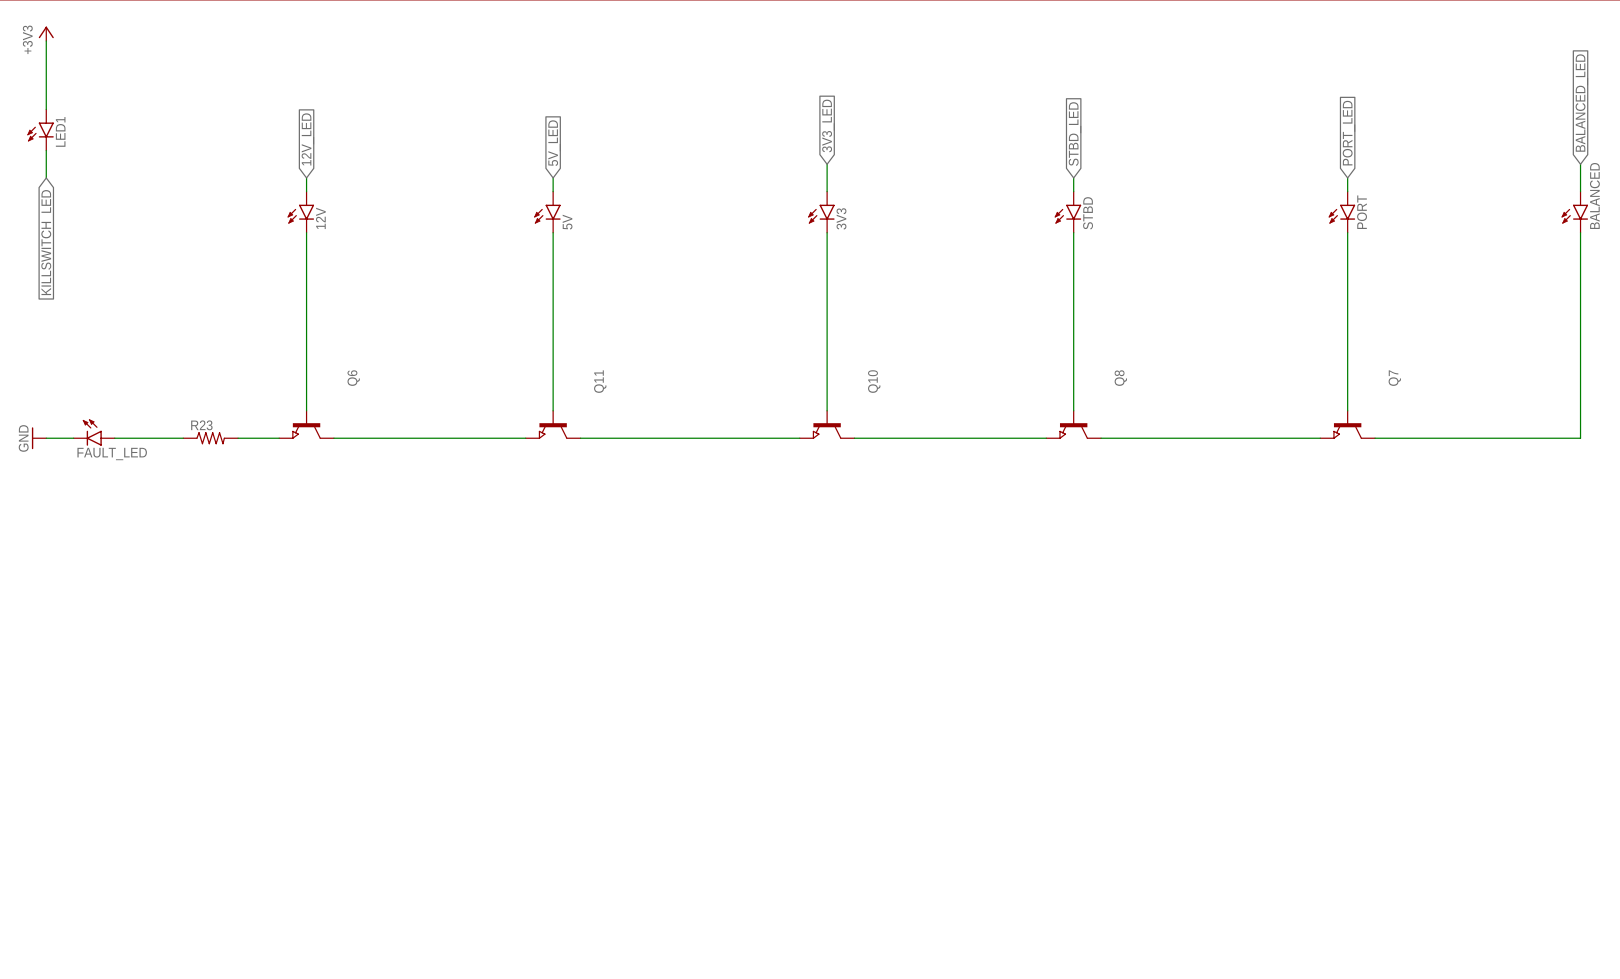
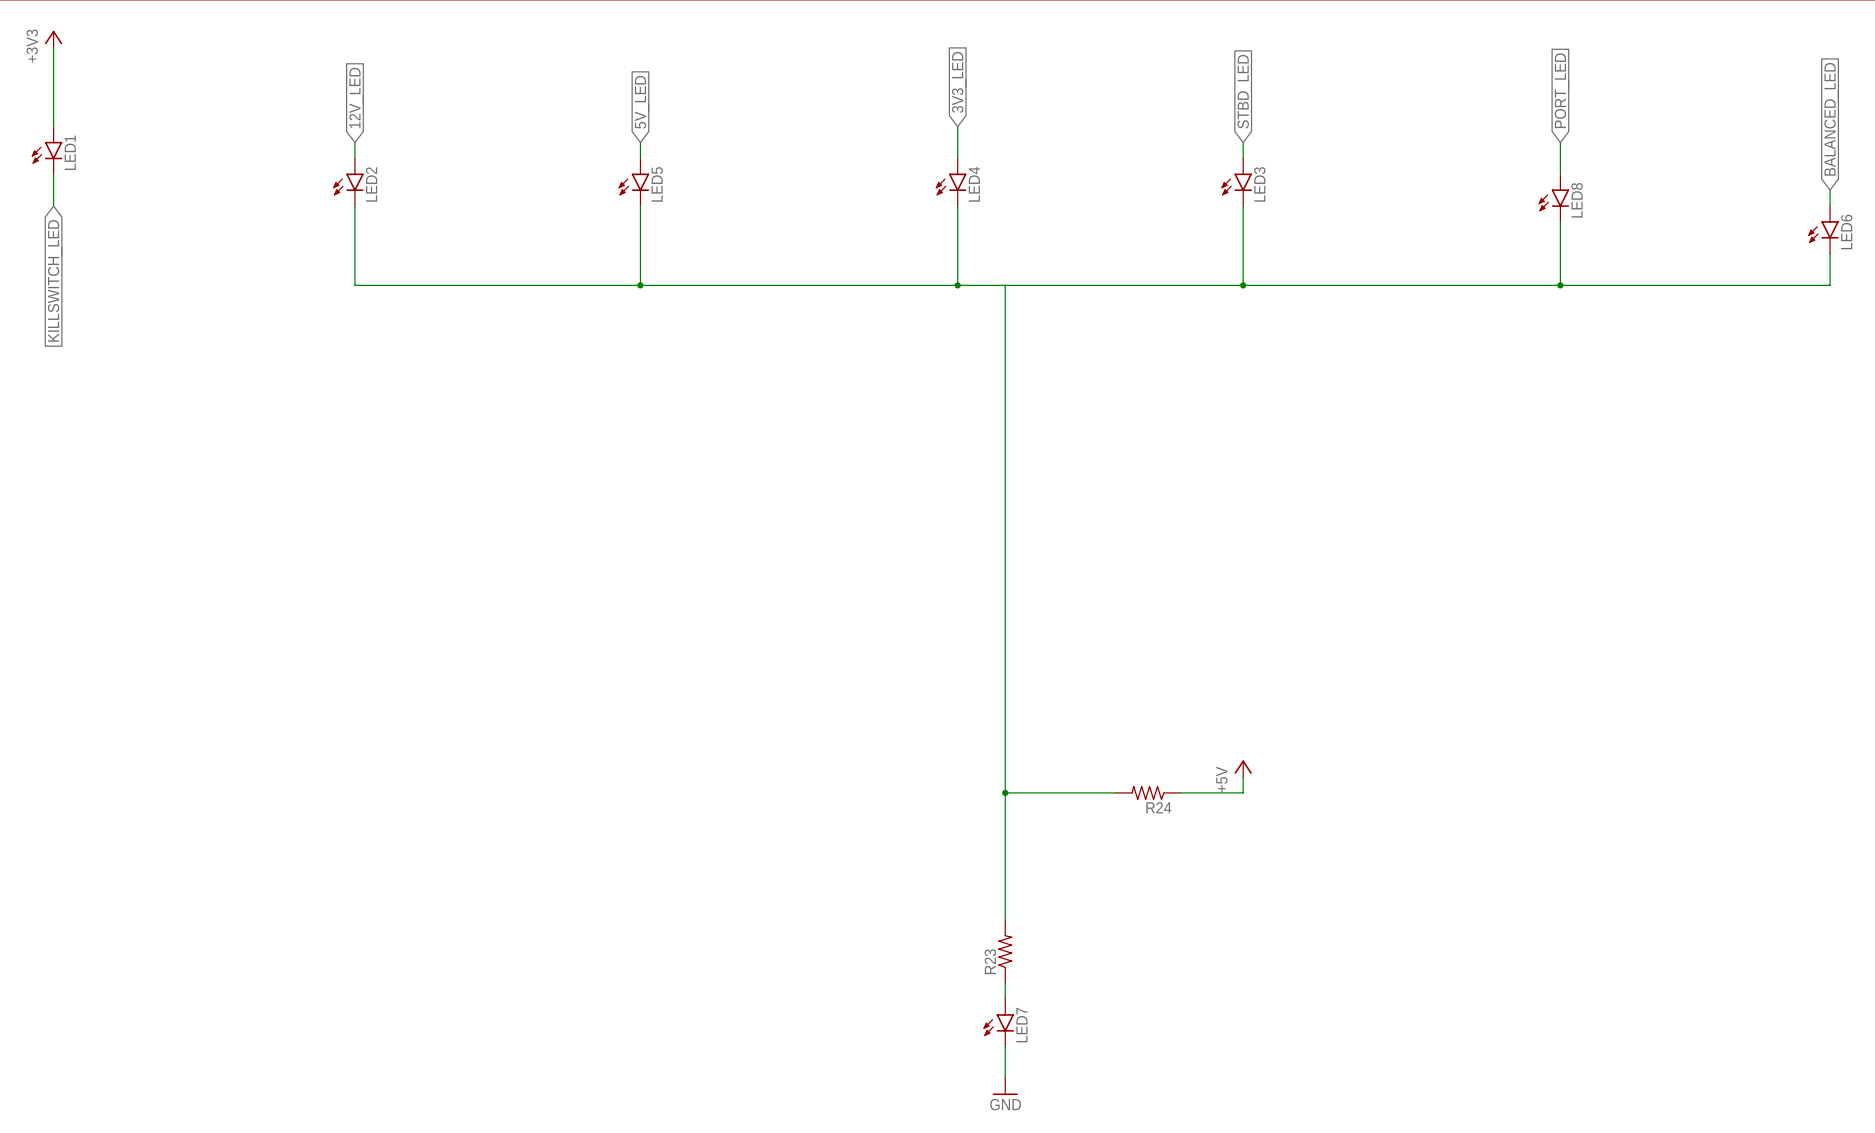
wire: none -> (957, 126) (957, 158)
wire: none -> (354, 142) (354, 158)
wire: none -> (1243, 142) (1243, 158)
wire: none -> (1560, 142) (1560, 174)
global label position: 3V3_LED (828, 125) -> 3V3_LED (959, 82)
global label position: PORT_LED (1348, 133) -> PORT_LED (1561, 90)
global label position: STBD_LED (1074, 134) -> STBD_LED (1244, 91)
global label position: 12V_LED (307, 139) -> 12V_LED (356, 97)
global label position: 5V_LED (554, 143) -> 5V_LED (642, 102)
LED2: none -> (348, 182)
LED5: none -> (633, 182)
LED4: none -> (951, 182)
LED3: none -> (1236, 182)
LED8: none -> (1553, 198)
LED6: none -> (1823, 229)
12V: (300, 212) -> none
5V: (547, 212) -> none
3V3: (821, 212) -> none
STBD: (1067, 212) -> none
PORT: (1341, 212) -> none
BALANCED: (1574, 212) -> none
wire: (306, 246) (306, 410) -> none
wire: (553, 246) (553, 410) -> none
junction: none -> (640, 285)
wire: (827, 246) (827, 410) -> none
junction: none -> (957, 285)
wire: none -> (1005, 285) (1005, 919)
wire: (1073, 246) (1073, 410) -> none
junction: none -> (1243, 285)
wire: (1347, 246) (1347, 410) -> none
junction: none -> (1560, 285)
wire: (1580, 246) (1580, 438) (1375, 438) -> (1830, 285) (354, 285)
Q6: (306, 424) -> none
Q11: (553, 424) -> none
Q10: (827, 424) -> none
Q8: (1073, 424) -> none
Q7: (1347, 424) -> none
FAULT_LED: (94, 432) -> none
power symbol: GND (39, 438) -> none
wire: (46, 438) (73, 438) -> none
wire: (114, 438) (183, 438) -> none
R23 rotation: 0° (210, 438) -> 90° counterclockwise (1005, 951)
R23 position: (210, 438) -> (1005, 951)
wire: (238, 438) (279, 438) -> none
wire: (333, 438) (525, 438) -> none
wire: (580, 438) (799, 438) -> none
wire: (854, 438) (1046, 438) -> none
wire: (1101, 438) (1320, 438) -> none
power symbol: none -> +5V (1243, 768)
wire: none -> (1243, 777) (1243, 792) (1179, 792)
wire: none -> (1005, 792) (1116, 792)
junction: none -> (1005, 792)
R24: none -> (1148, 792)
wire: none -> (1005, 983) (1005, 999)
LED7: none -> (998, 1022)
wire: none -> (1005, 1046) (1005, 1078)
power symbol: none -> GND (1005, 1086)

